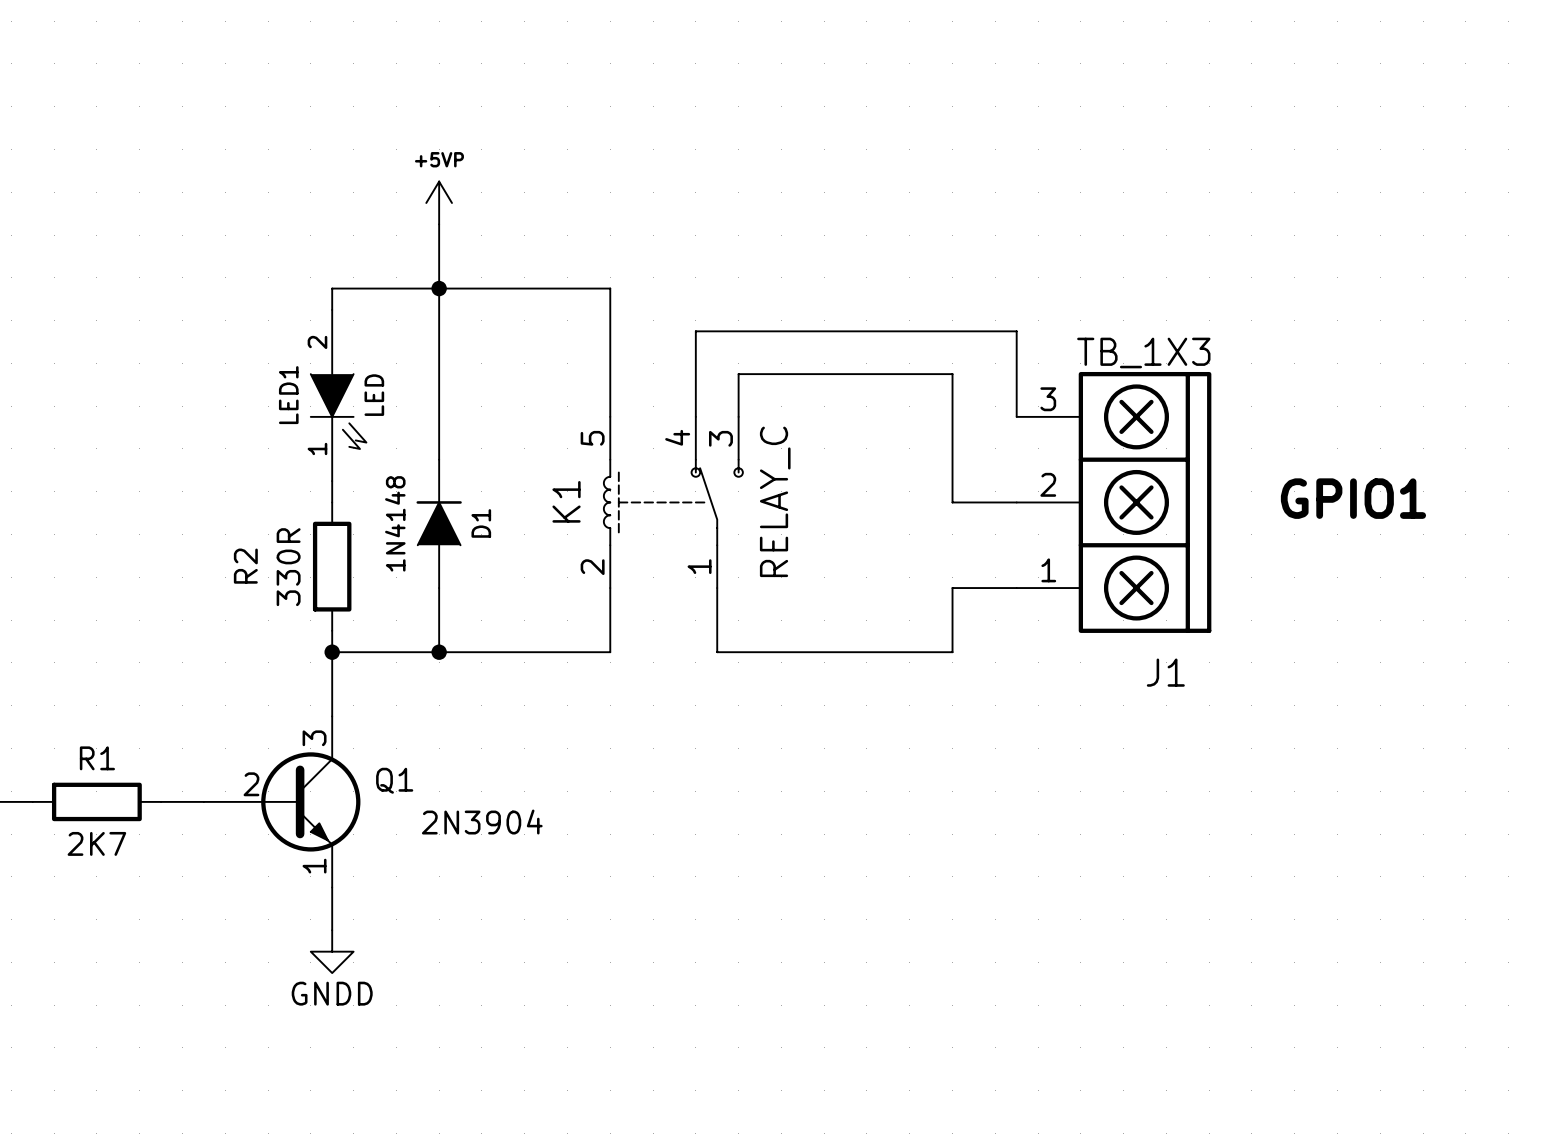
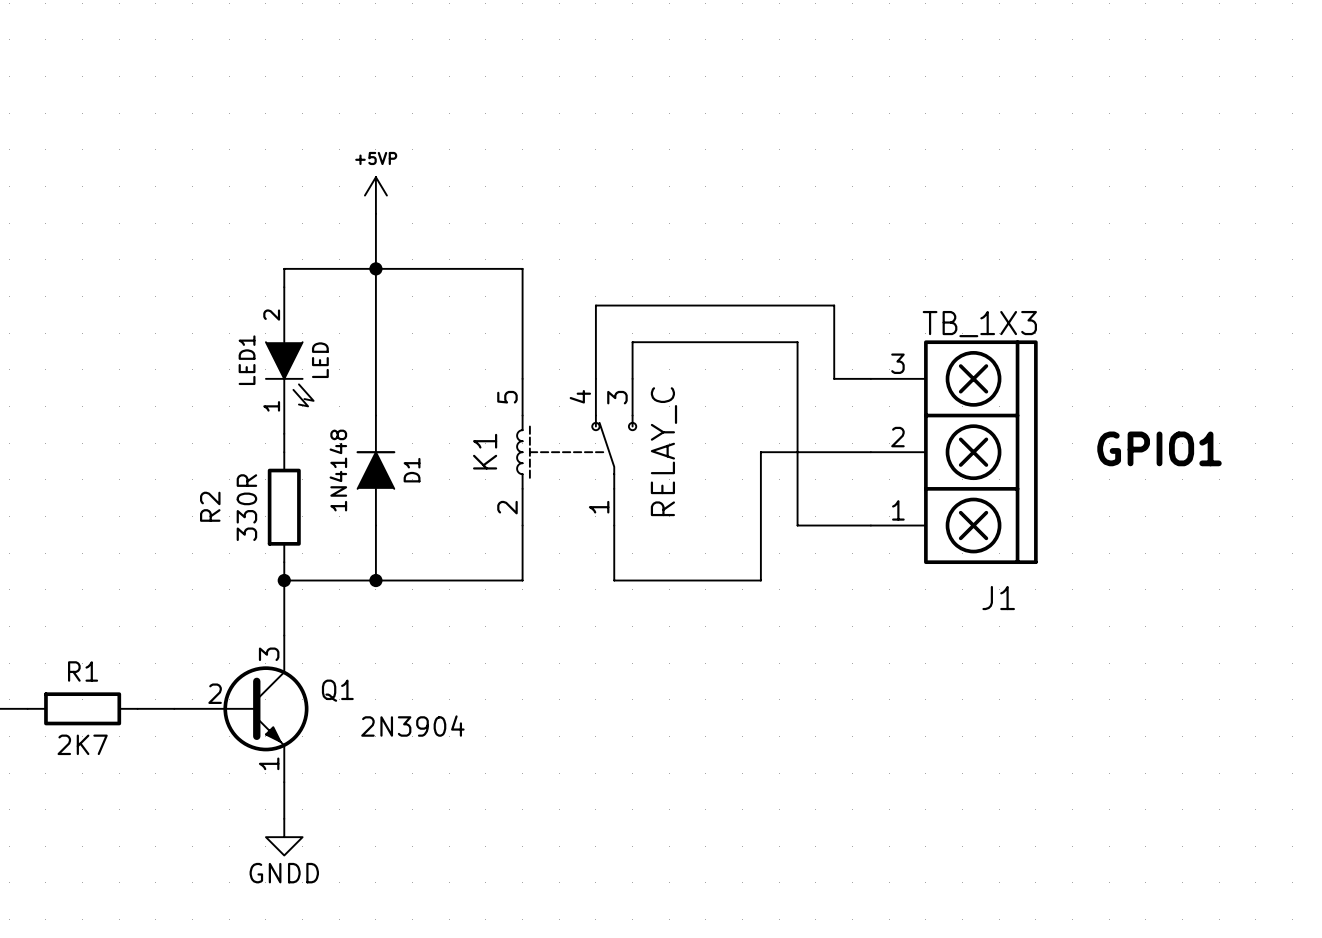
wire: (973, 331) (1016, 331) (1016, 416) -> (834, 305) (834, 378) (870, 378)
wire: (931, 374) (952, 374) (952, 502) -> (797, 342) (797, 525) (815, 525)
wire: (952, 588) (952, 652) (888, 652) -> (815, 452) (760, 452) (760, 580)

